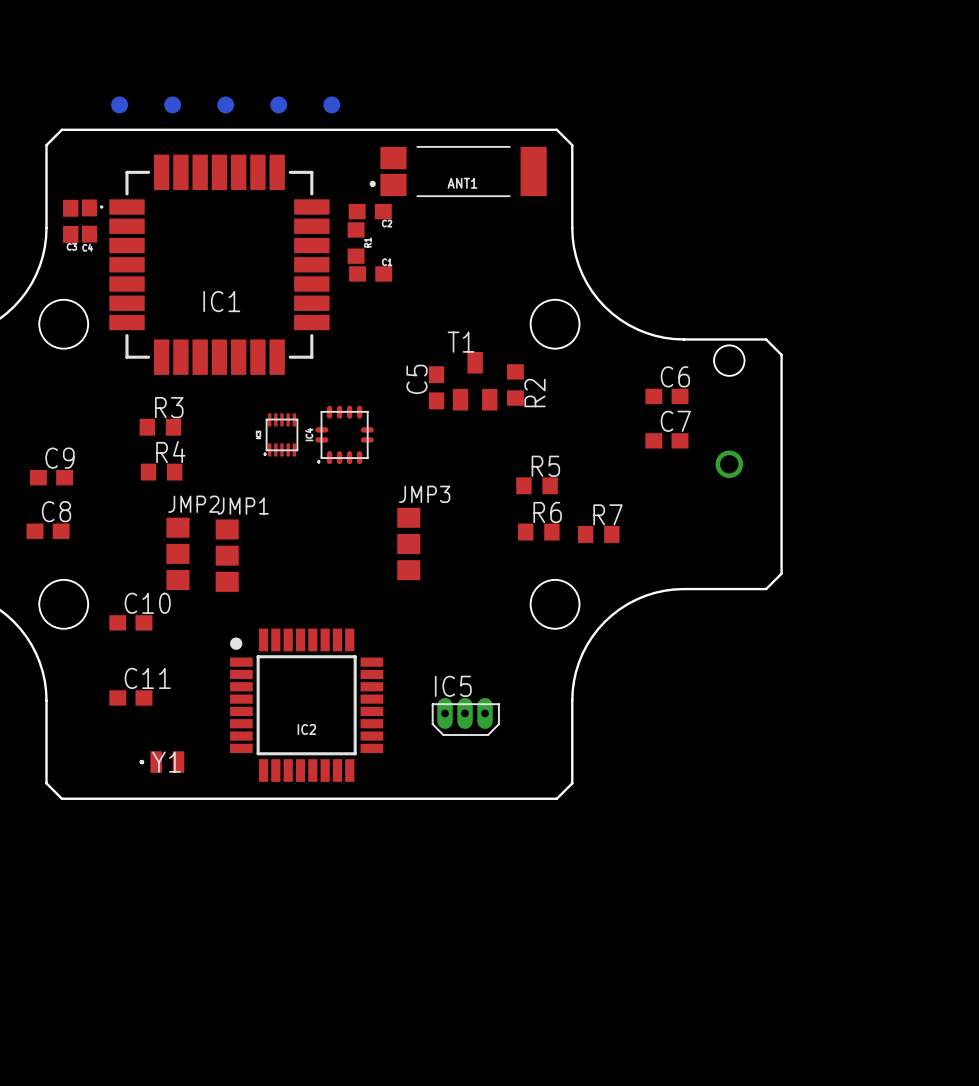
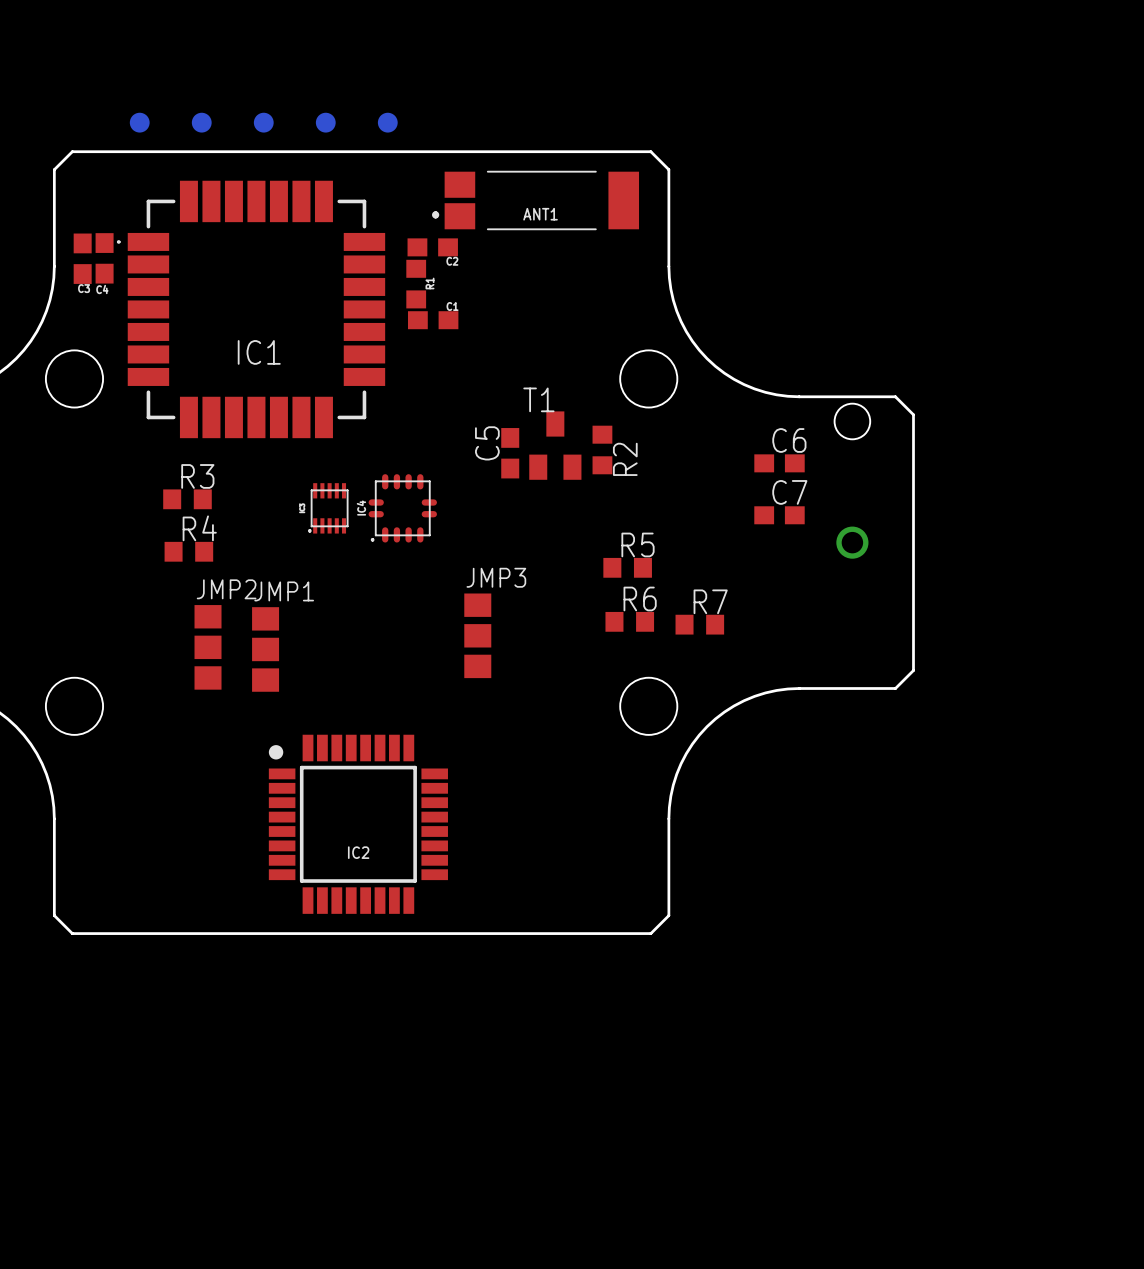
C9: (51, 477) -> none
C8: (48, 531) -> none
C10: (130, 622) -> none
C11: (130, 697) -> none
IC5: (465, 716) -> none
Y1: (161, 762) -> none

